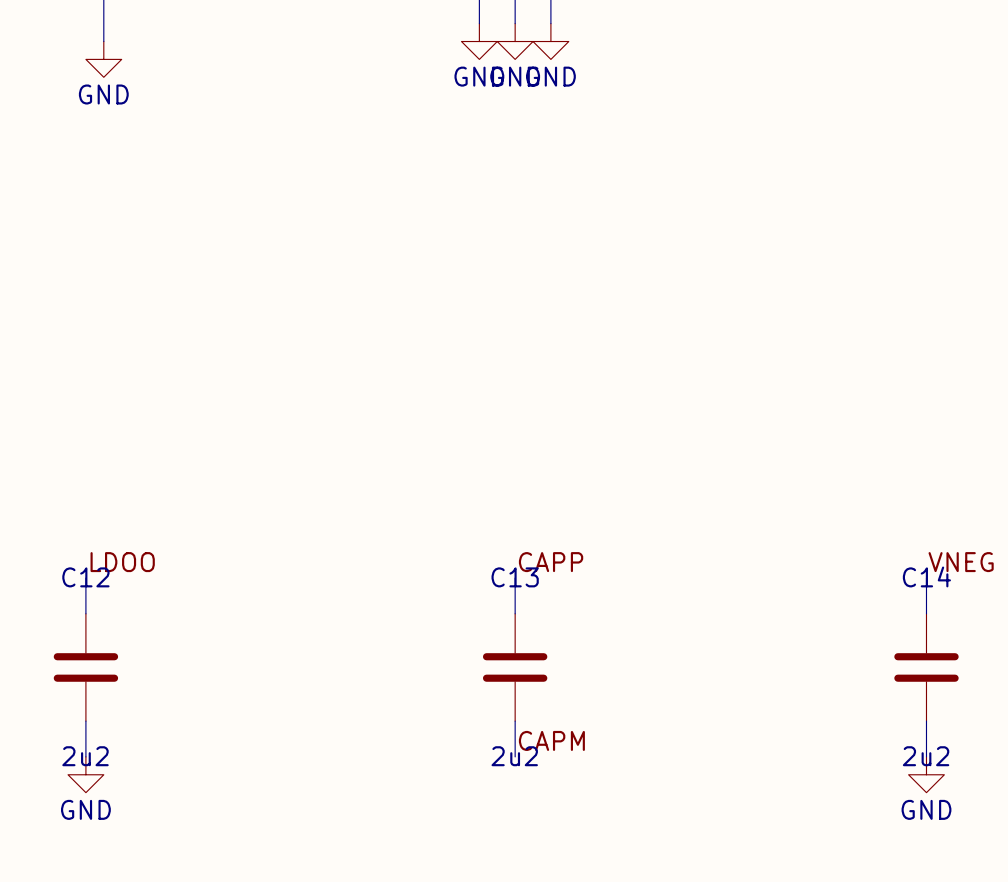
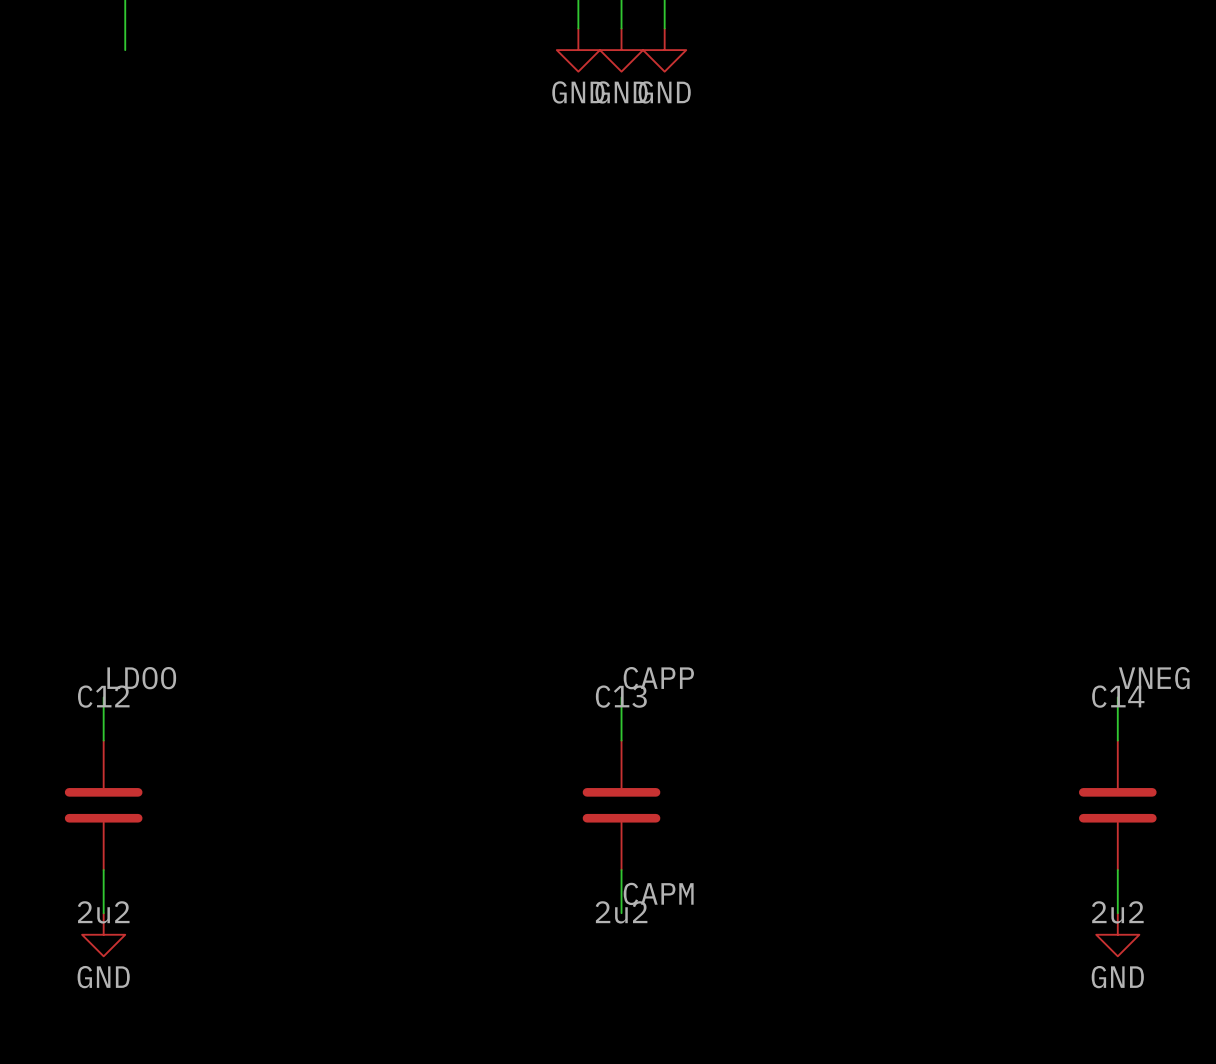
power symbol: GND (103, 59) -> none

